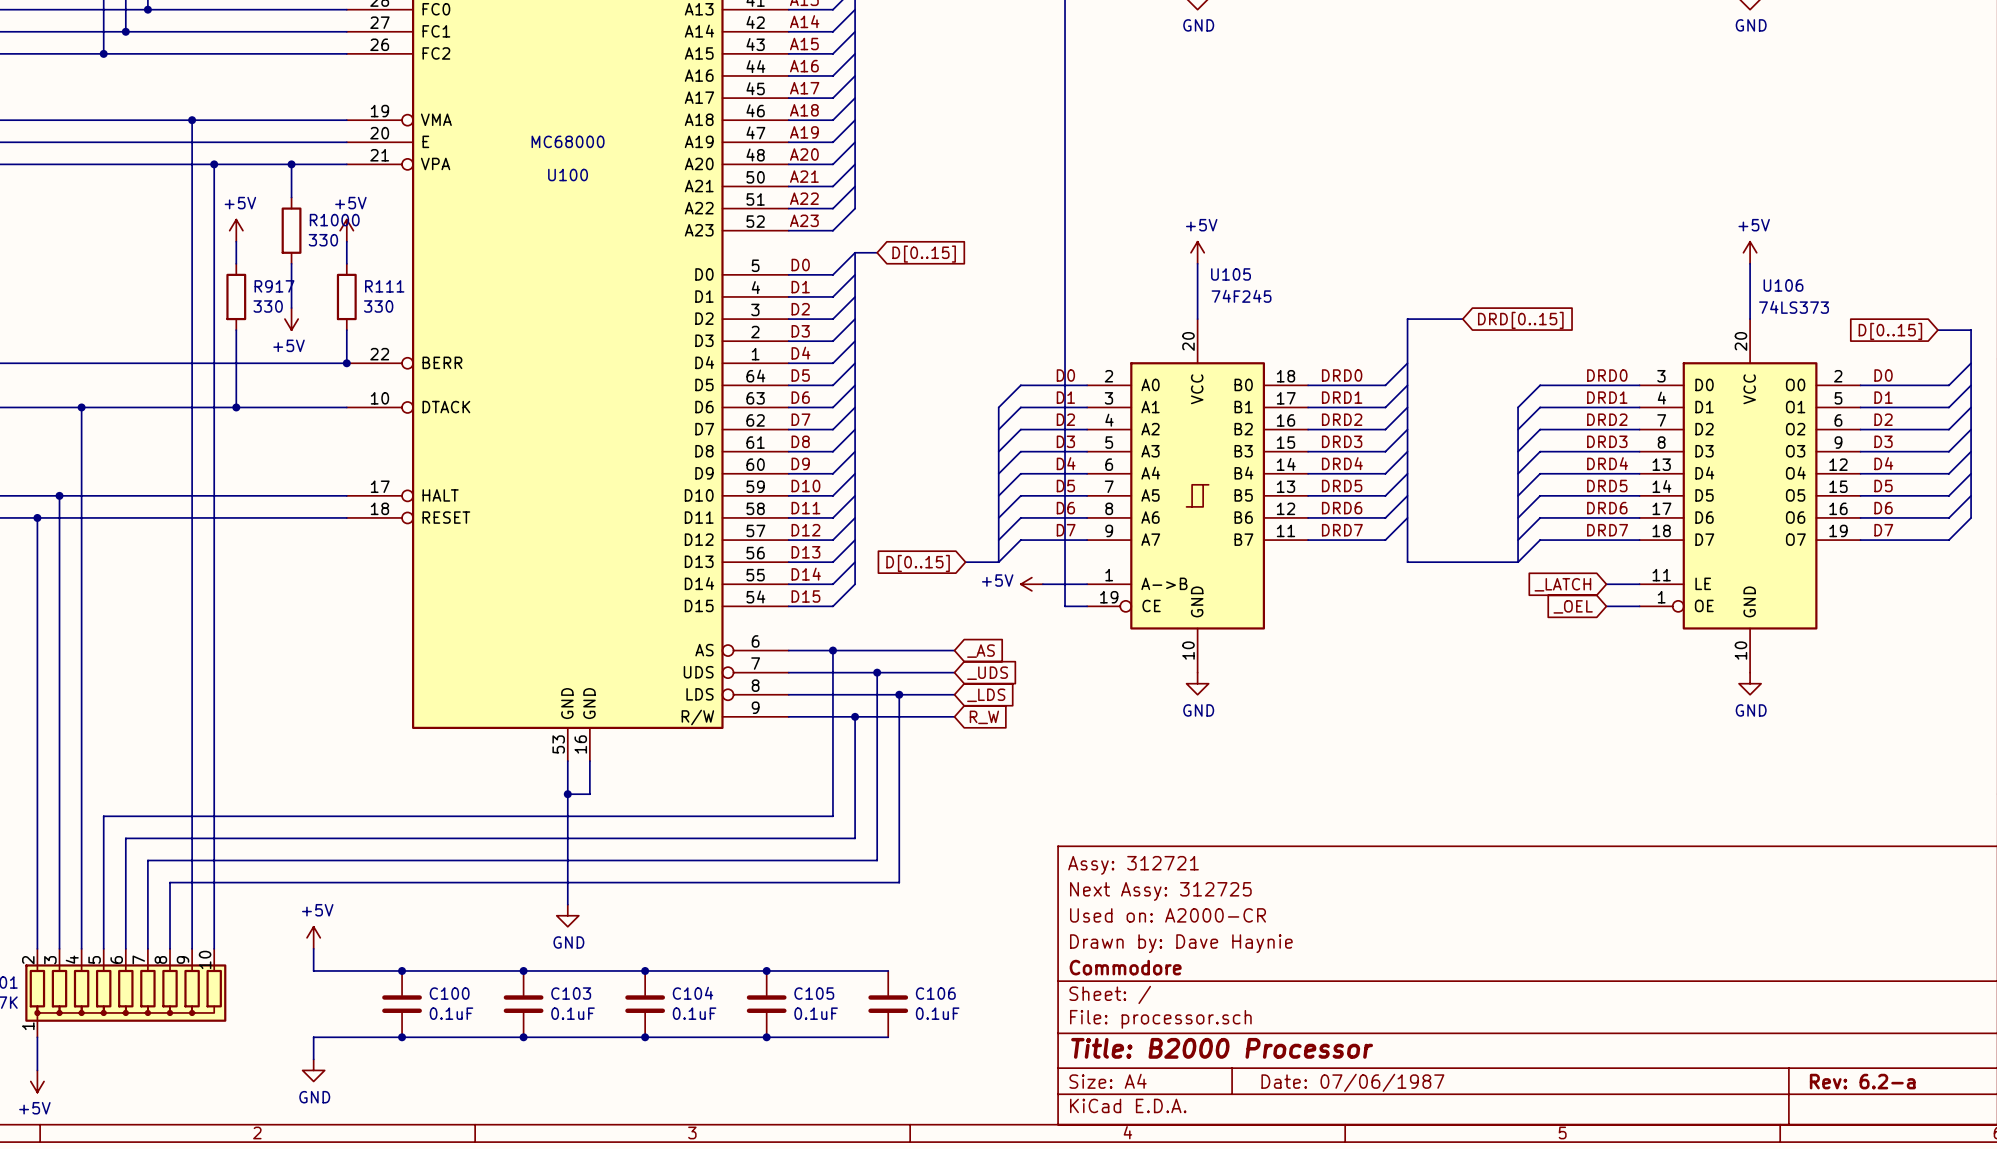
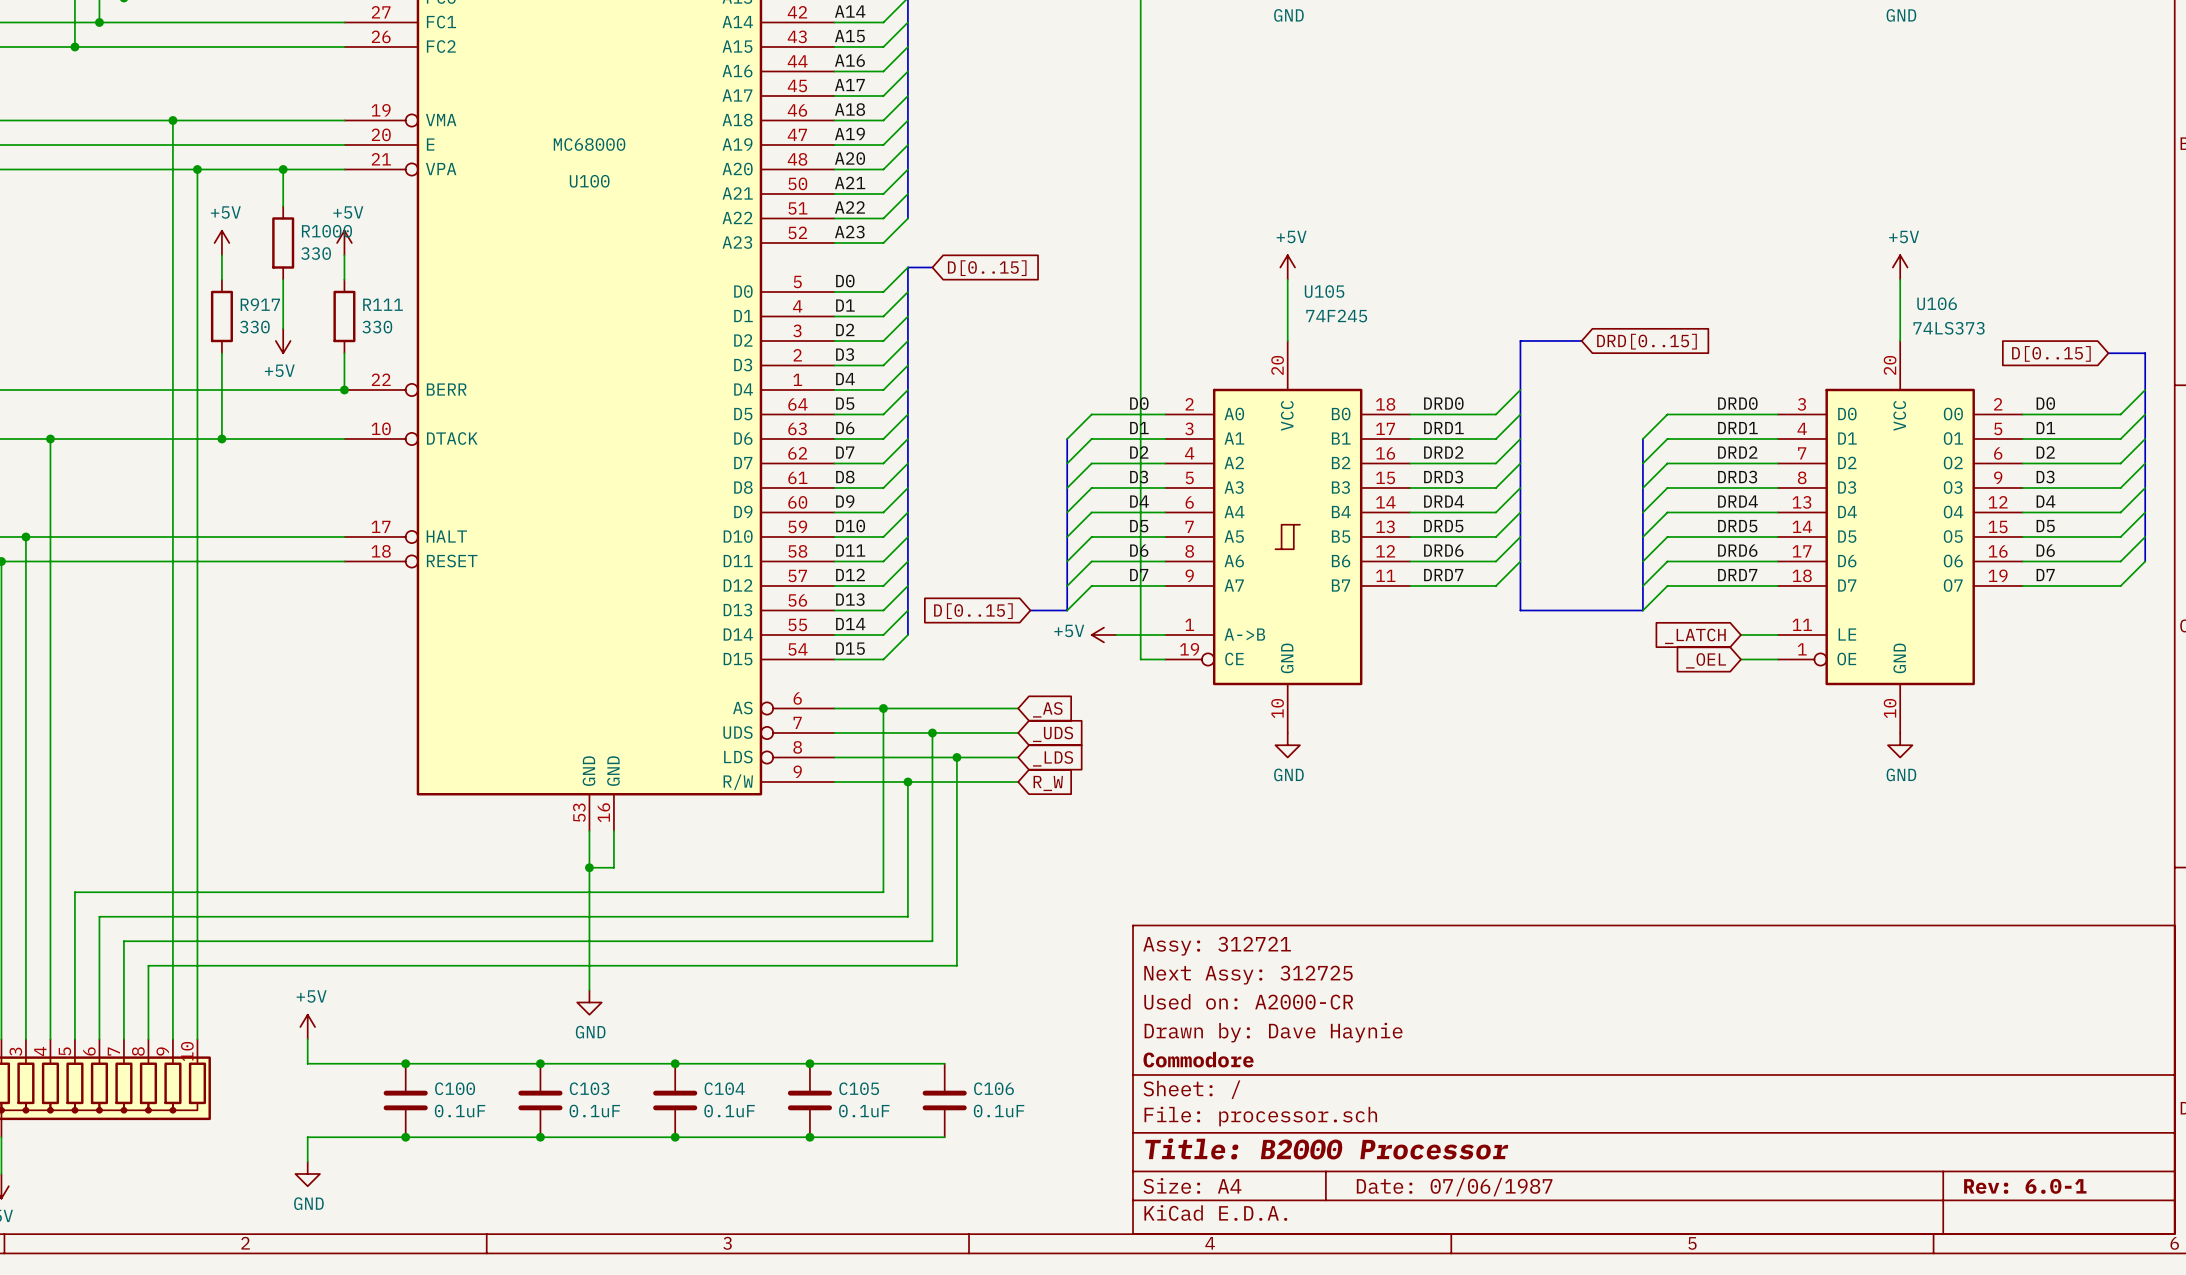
title block: Rev: 6.2-a (1862, 1081) -> Rev: 6.0-1 (2025, 1186)

